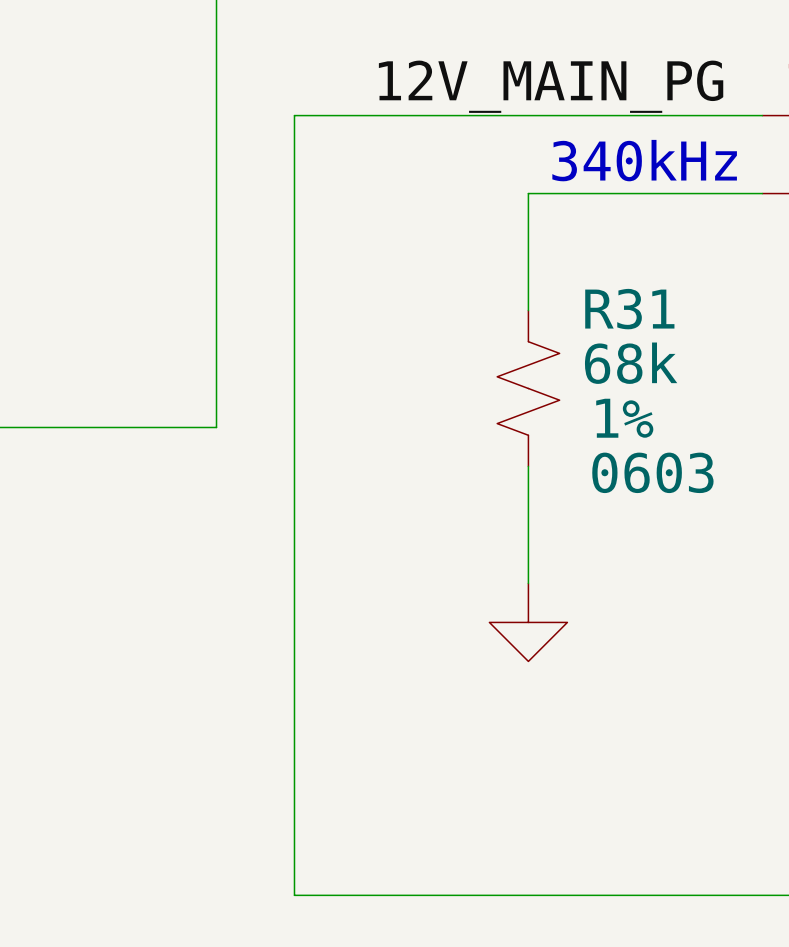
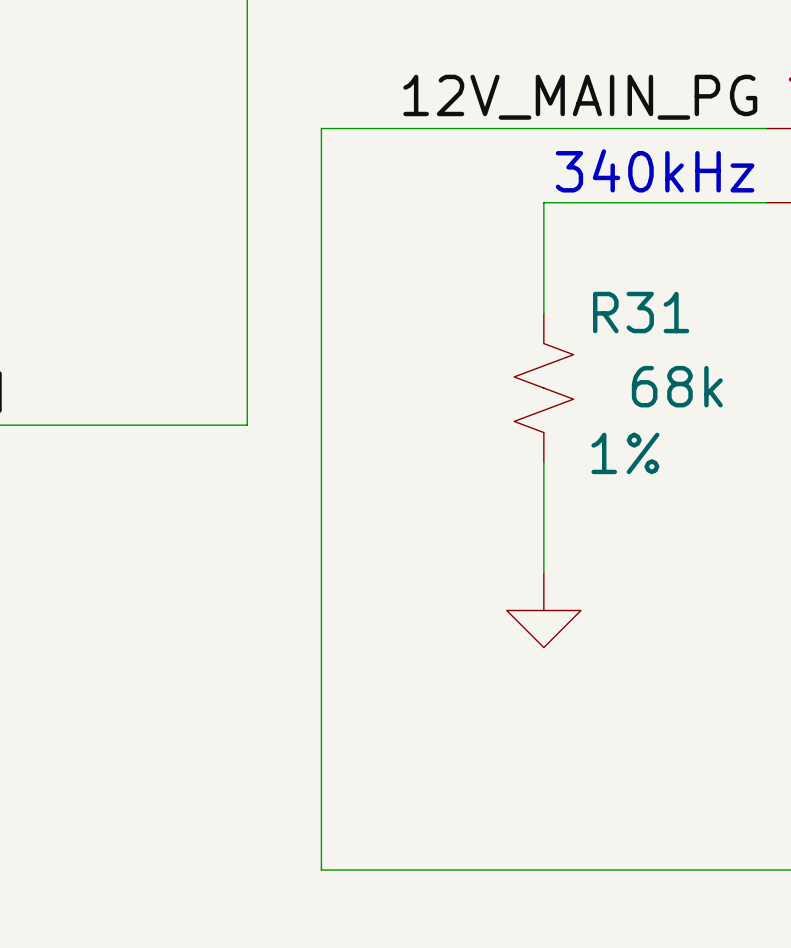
R31 value position: 68k (631, 363) -> 68k (677, 386)
R31 text position: 1% (624, 418) -> 1% (625, 453)
R31 text: 0603 (652, 472) -> none

